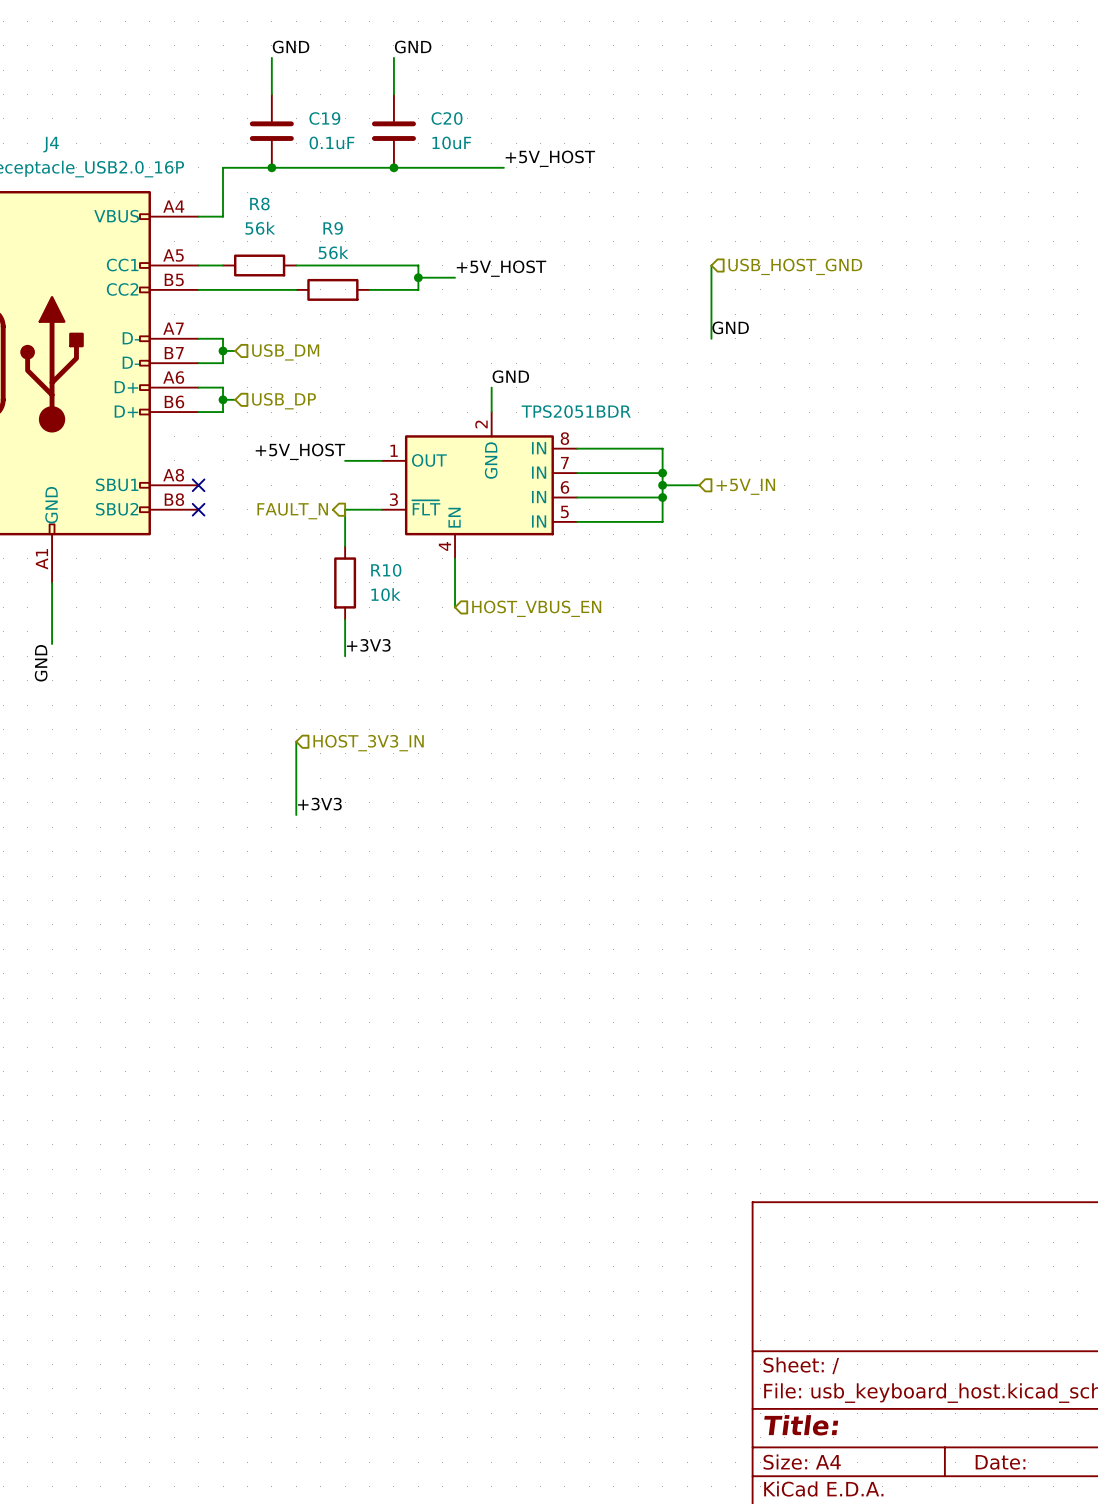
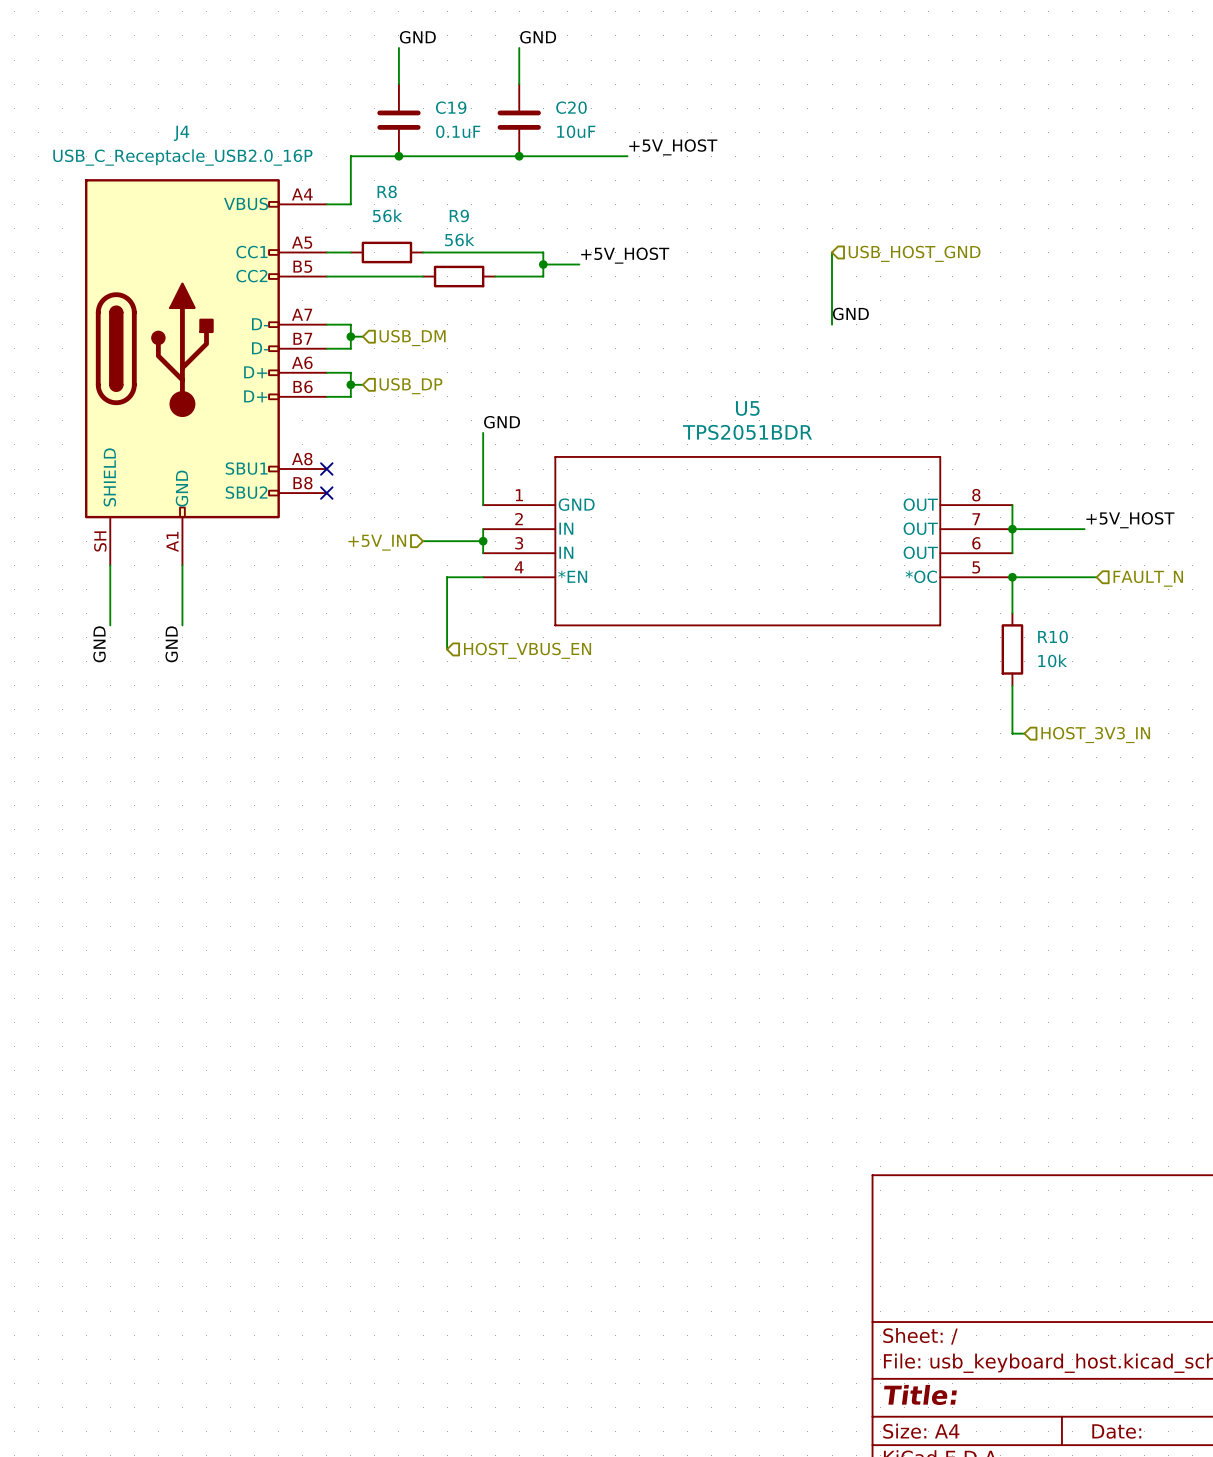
label position: GND (510, 376) -> GND (502, 422)
wire: (491, 387) (491, 412) -> (483, 529) (483, 553)
wire: none -> (483, 432) (483, 505)
wire: (577, 448) (662, 448) (662, 521) (577, 521) -> none
label: +5V_HOST (300, 451) -> none
wire: (345, 460) (381, 460) -> none
junction: (662, 473) -> none
part: TPS2051BDR (479, 485) -> none
wire: (662, 485) (699, 485) -> none
junction: (662, 485) -> none
hierarchical label: +5V_IN (745, 486) -> none
wire: (577, 497) (662, 497) -> none
junction: (662, 497) -> none
wire: (381, 509) (345, 509) (345, 546) -> none
hierarchical label: FAULT_N (292, 511) -> none
wire: none -> (1012, 505) (1012, 553)
label: none -> +5V_HOST (1130, 520)
wire: none -> (1012, 529) (1084, 529)
junction: none -> (1012, 529)
wire: none -> (423, 541) (483, 541)
junction: none -> (483, 541)
wire: (455, 558) (455, 607) -> none
U5: none -> TPS2051BDR (747, 541)
hierarchical label: none -> +5V_IN (377, 542)
R10 position: (345, 582) -> (1012, 649)
wire: none -> (483, 577) (447, 577) (447, 649)
junction: none -> (1012, 577)
wire: none -> (1096, 577) (1012, 577) (1012, 613)
hierarchical label: none -> FAULT_N (1148, 578)
hierarchical label position: HOST_VBUS_EN (536, 608) -> HOST_VBUS_EN (527, 650)
wire: (345, 619) (345, 656) -> none
label: +3V3 (368, 645) -> none
wire: none -> (1012, 685) (1012, 733) (1024, 733)
wire: (296, 741) (296, 815) -> none
hierarchical label: HOST_3V3_IN (368, 743) -> none
hierarchical label: none -> HOST_3V3_IN (1095, 735)
label: +3V3 (319, 804) -> none

